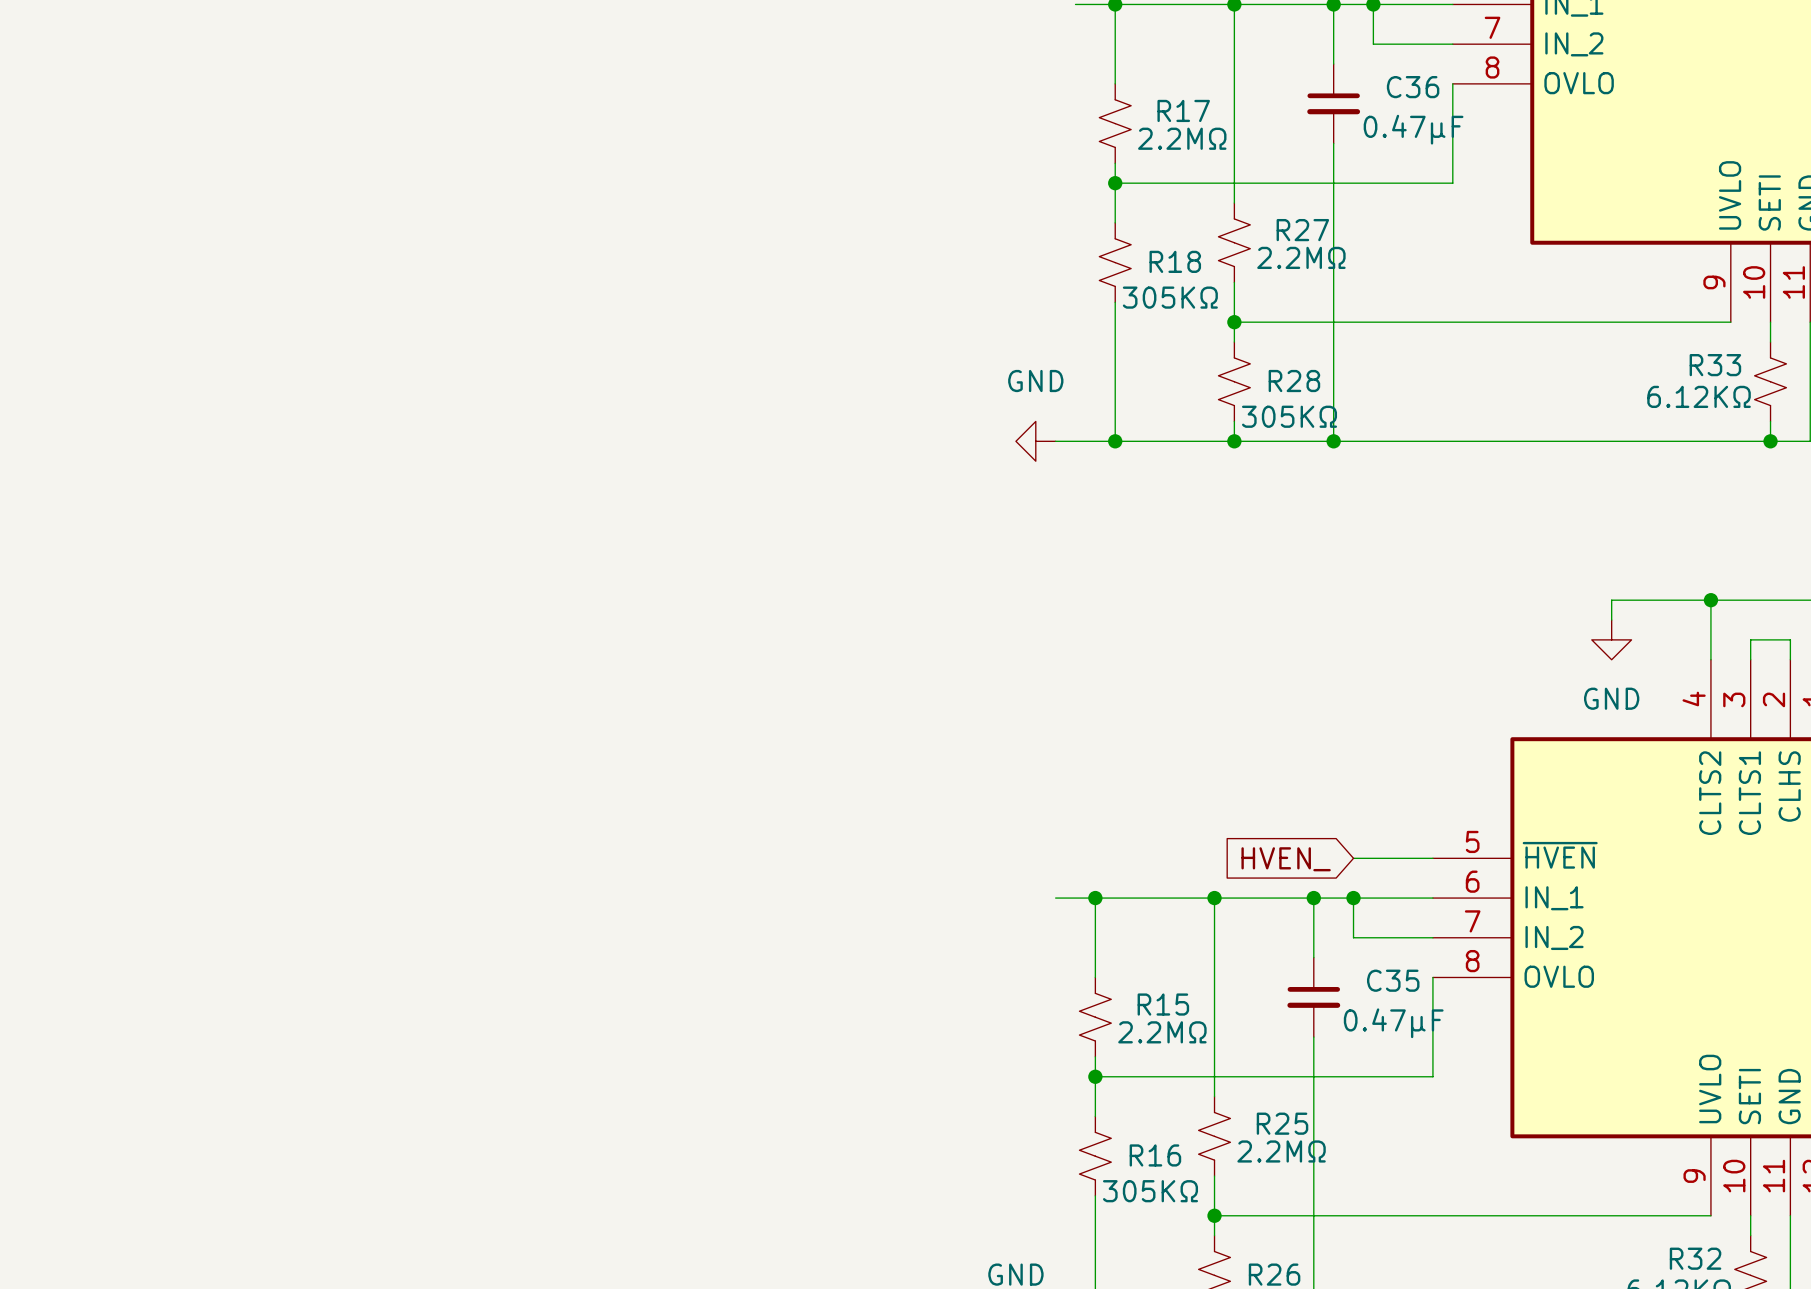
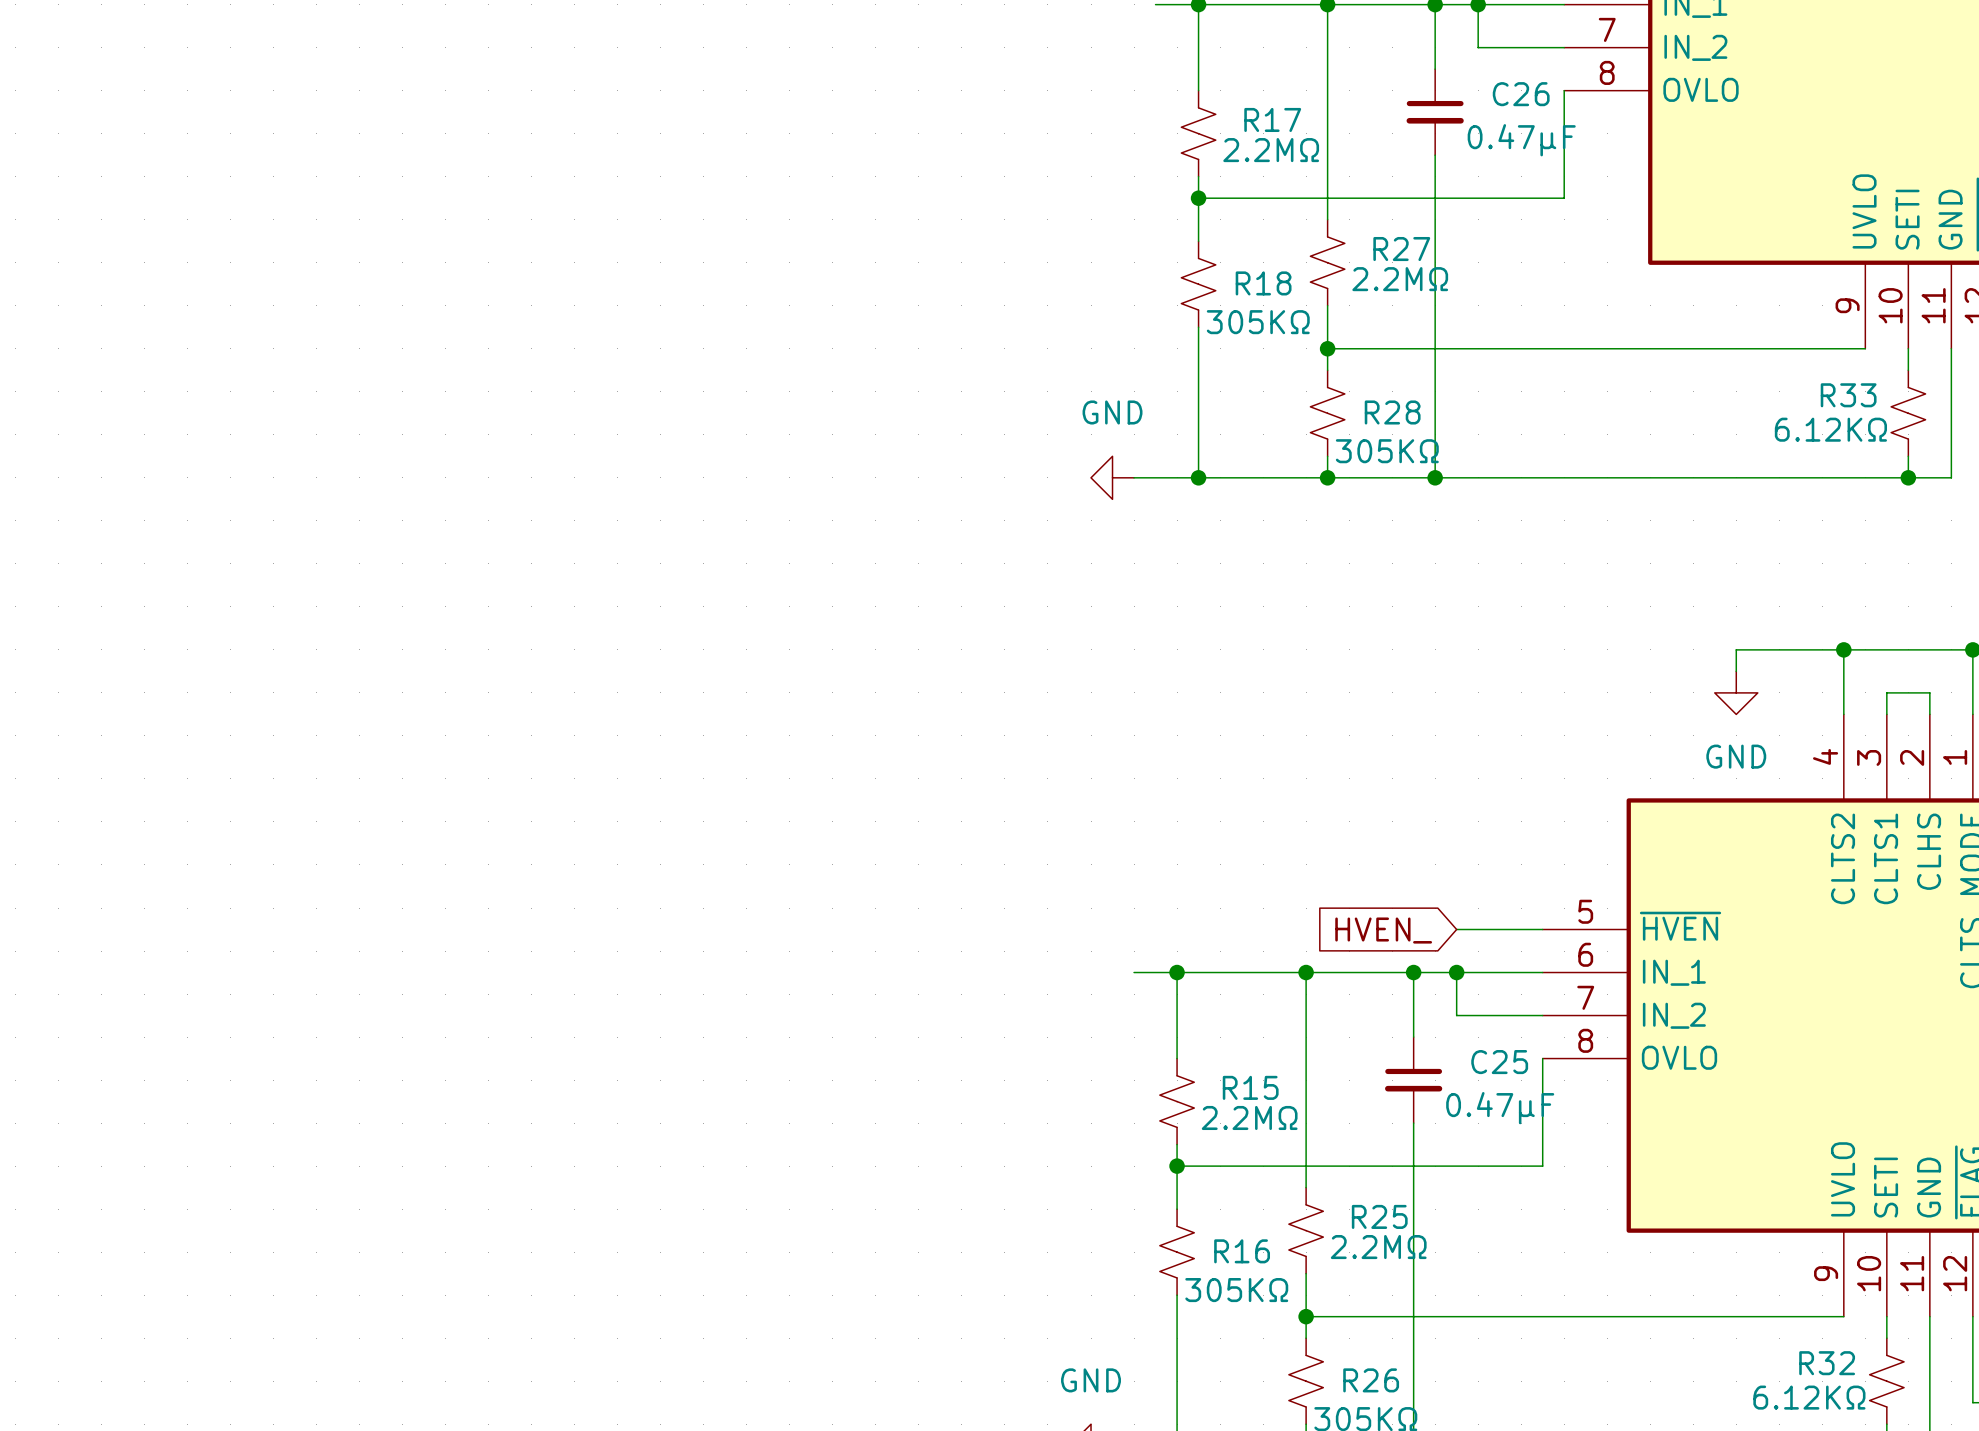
C36 name: C36 (1413, 87) -> C26 (1521, 94)
C35 name: C35 (1393, 980) -> C25 (1499, 1062)

